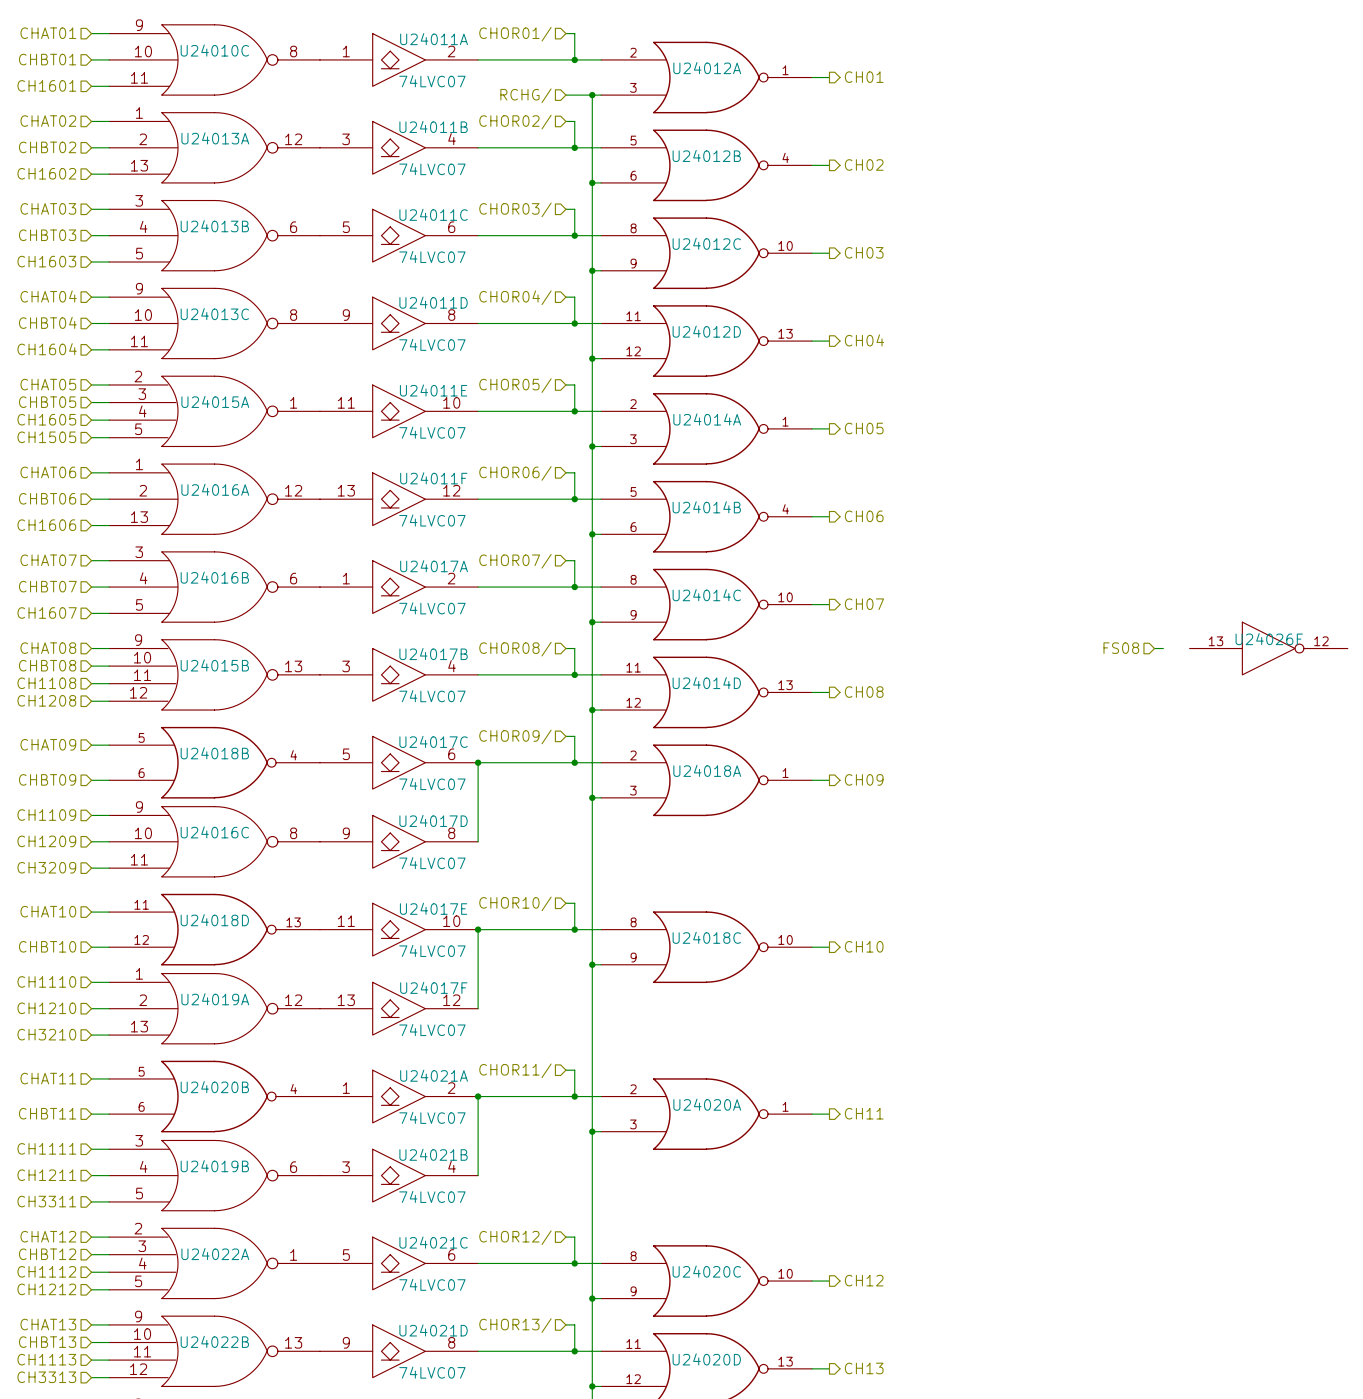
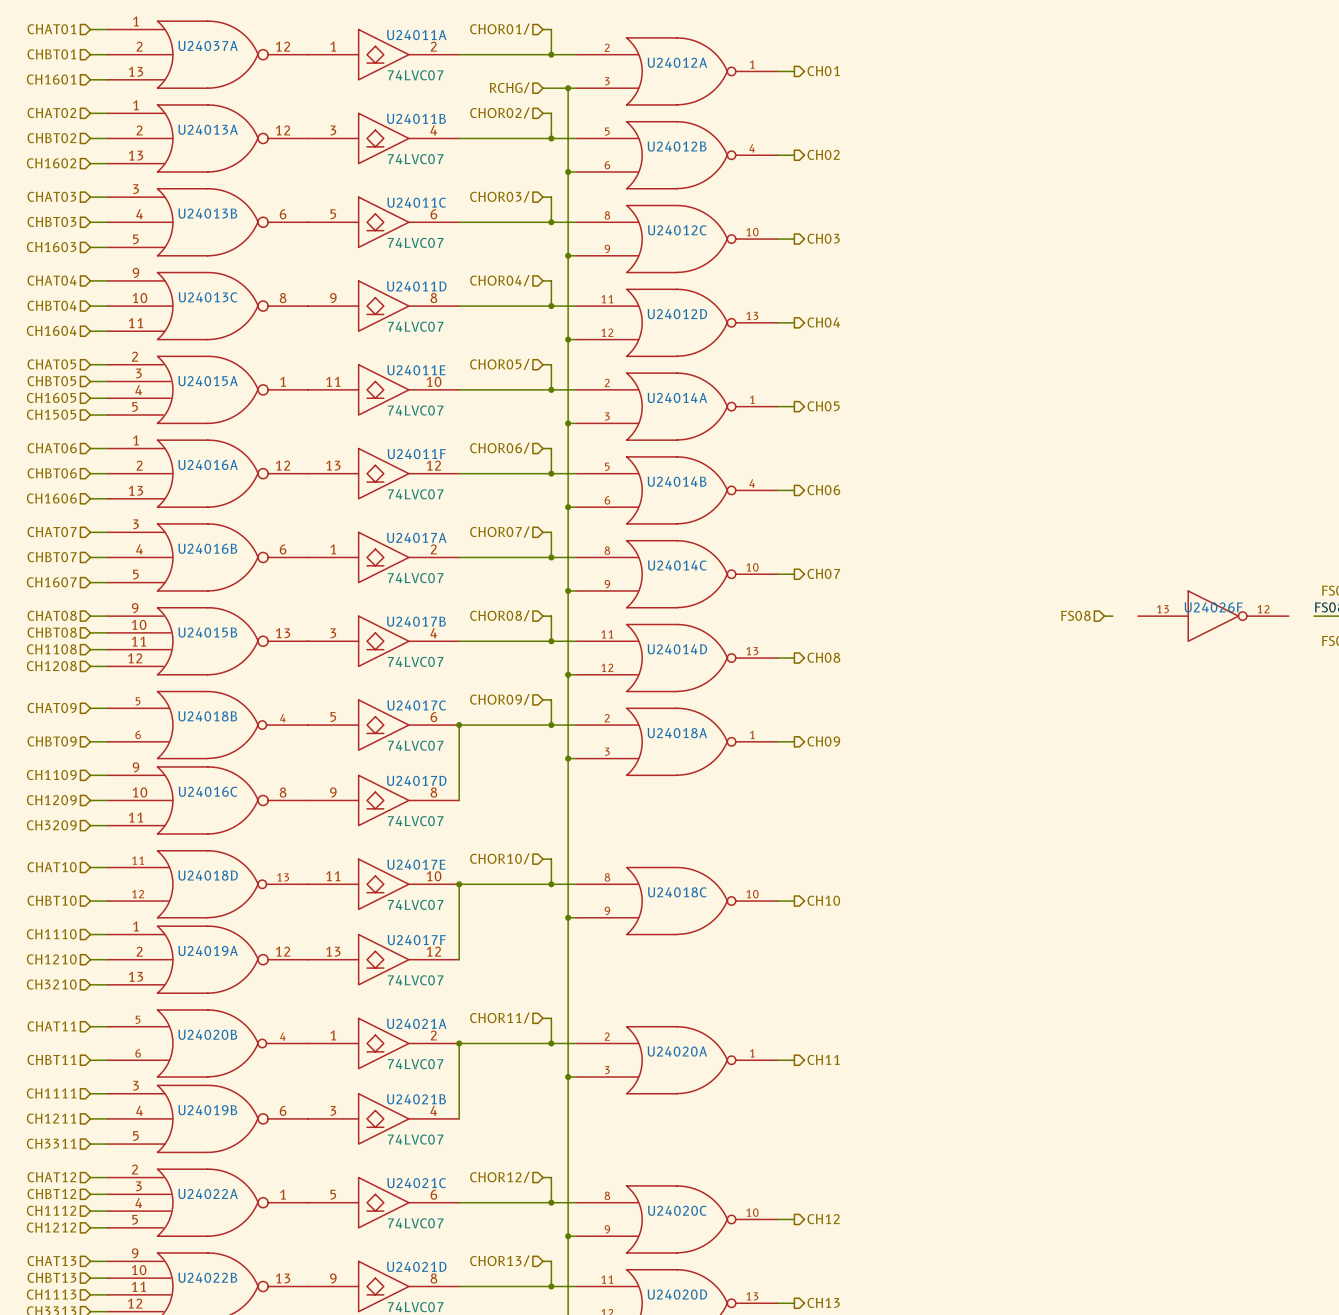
U24010C pin number: 9 (139, 25) -> 1 (135, 21)
U24010C name: U24010C (214, 50) -> U24037A (208, 45)
U24010C pin number: 10 (143, 51) -> 2 (139, 46)
U24010C pin number: 8 (293, 51) -> 12 (283, 46)
U24010C pin number: 11 (139, 77) -> 13 (136, 71)

